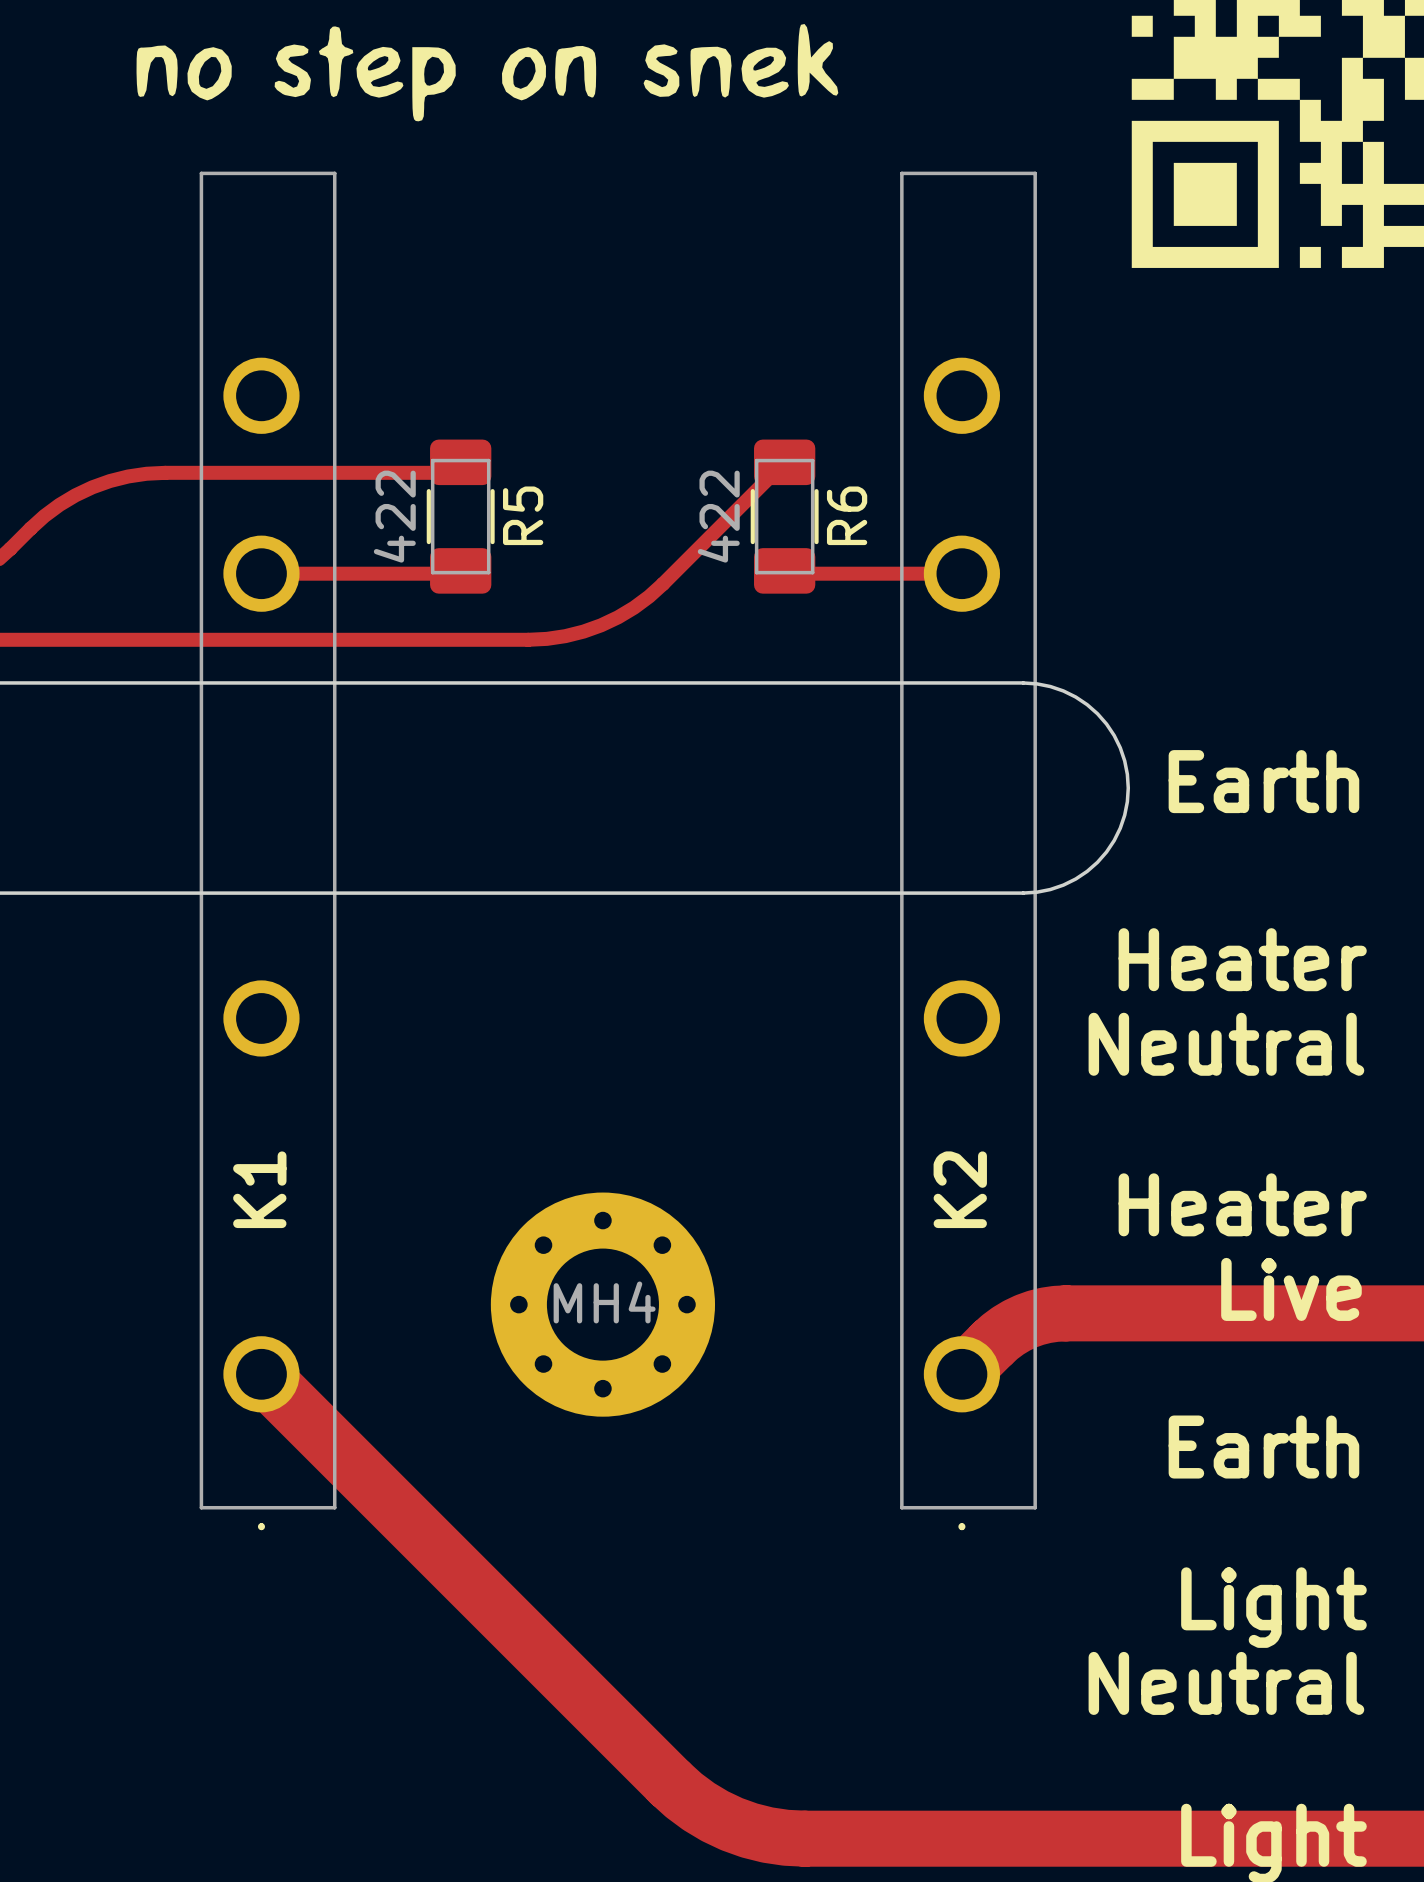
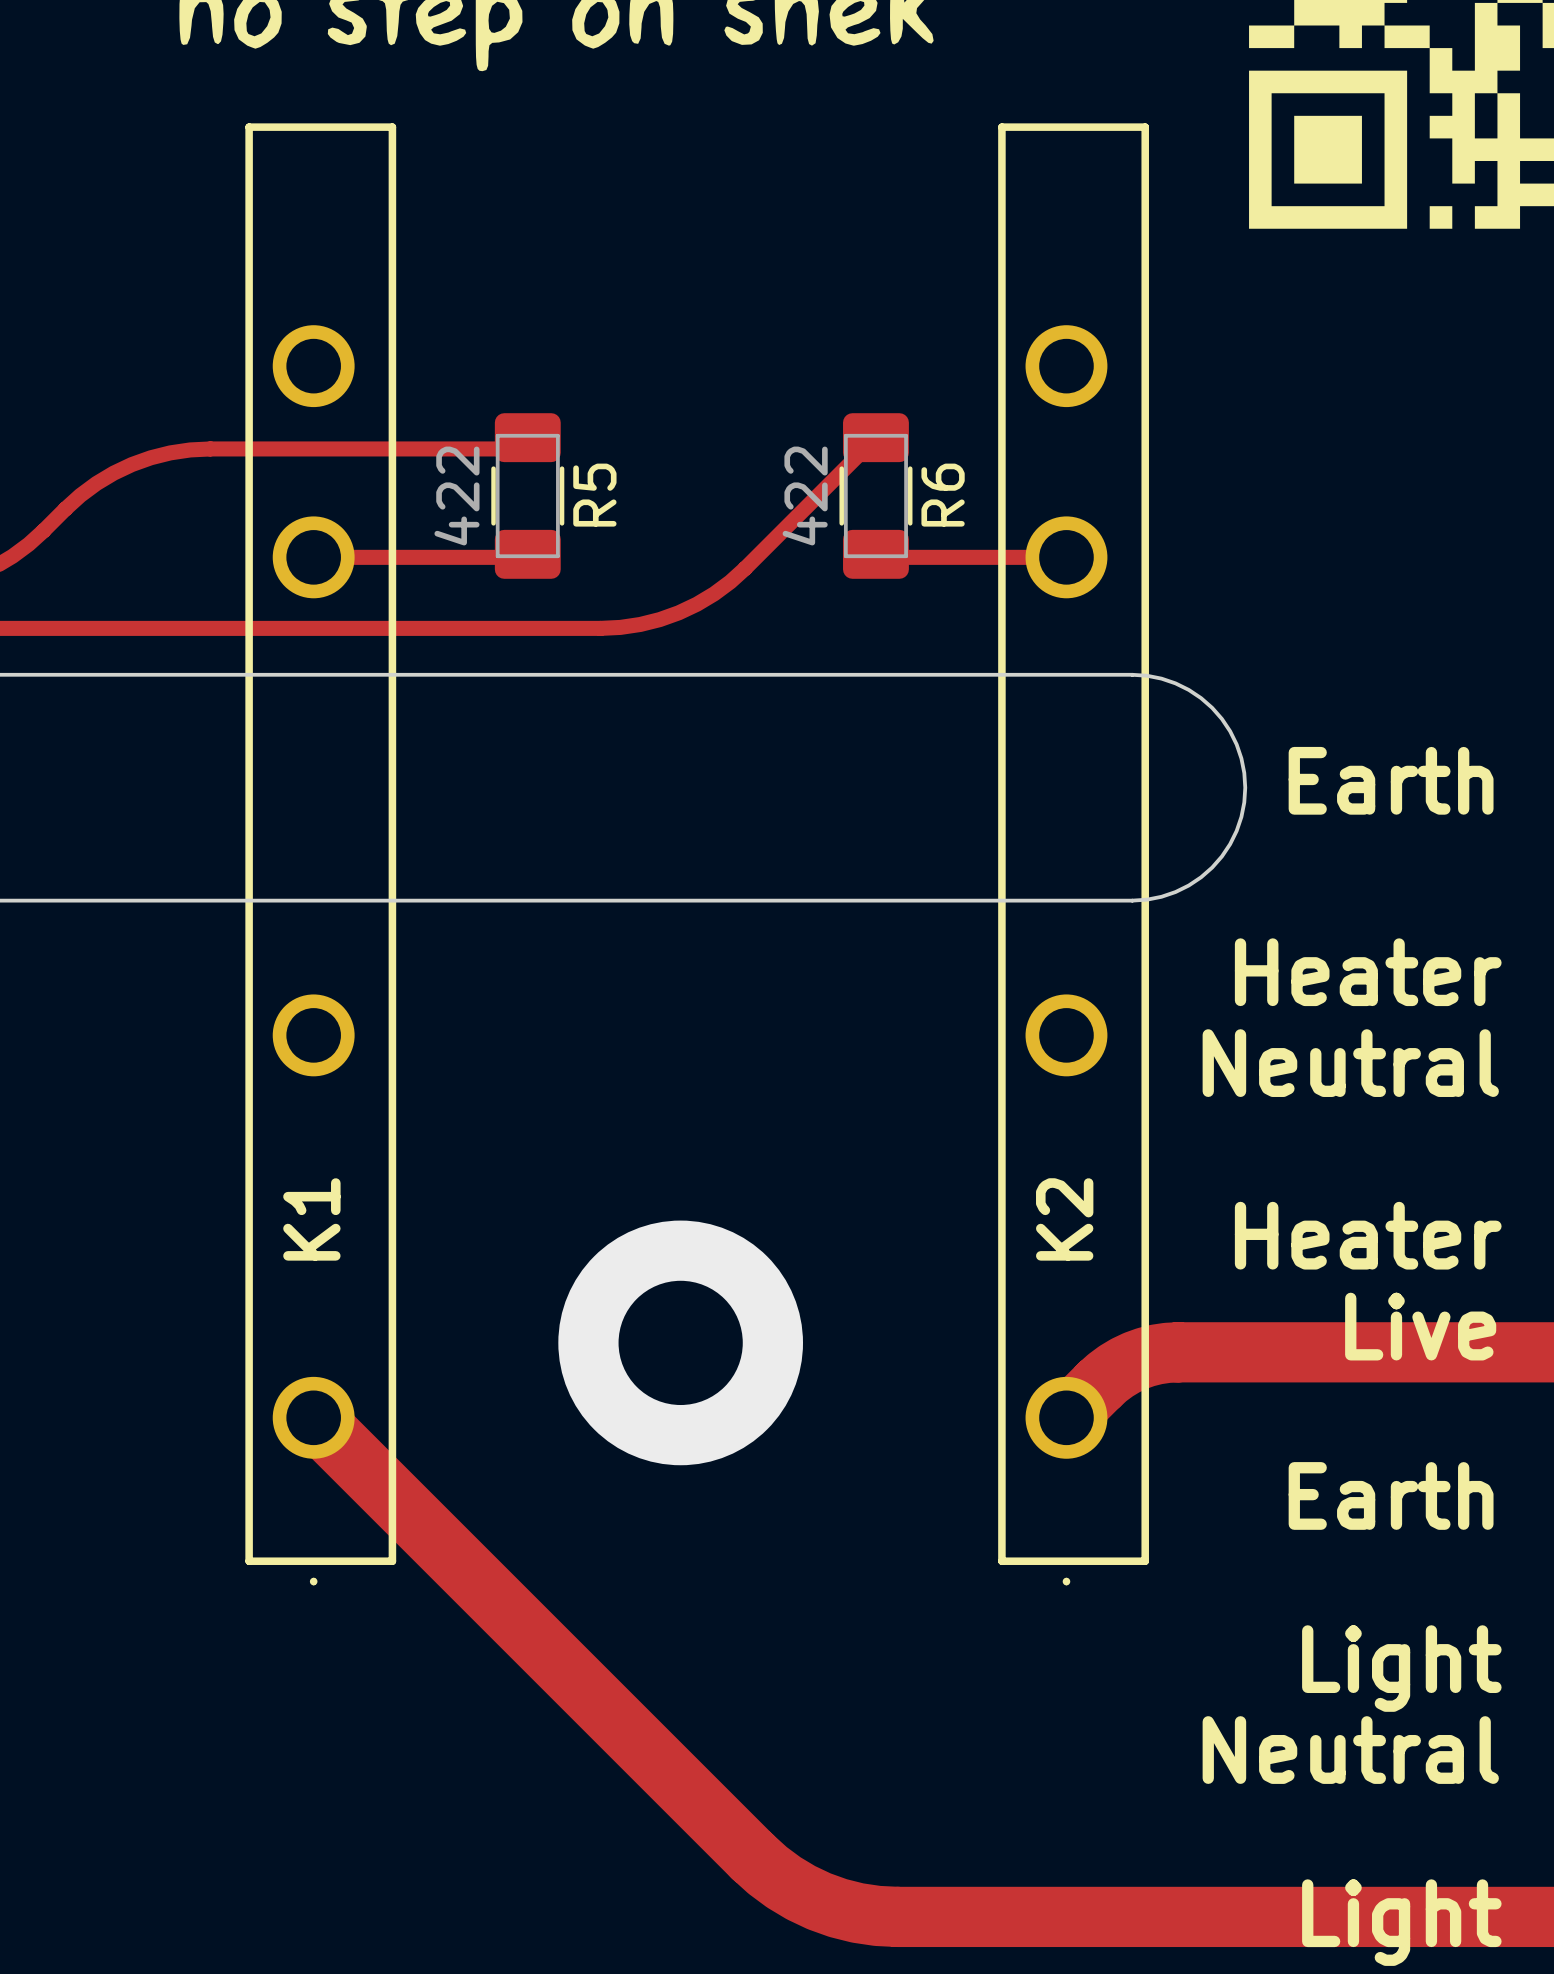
K1 footprint: [199, 171, 337, 1531] -> [245, 123, 397, 1586]
K2 footprint: [900, 171, 1037, 1531] -> [998, 123, 1149, 1586]
MH4: (602, 1304) -> none
via: none -> (680, 1342)

